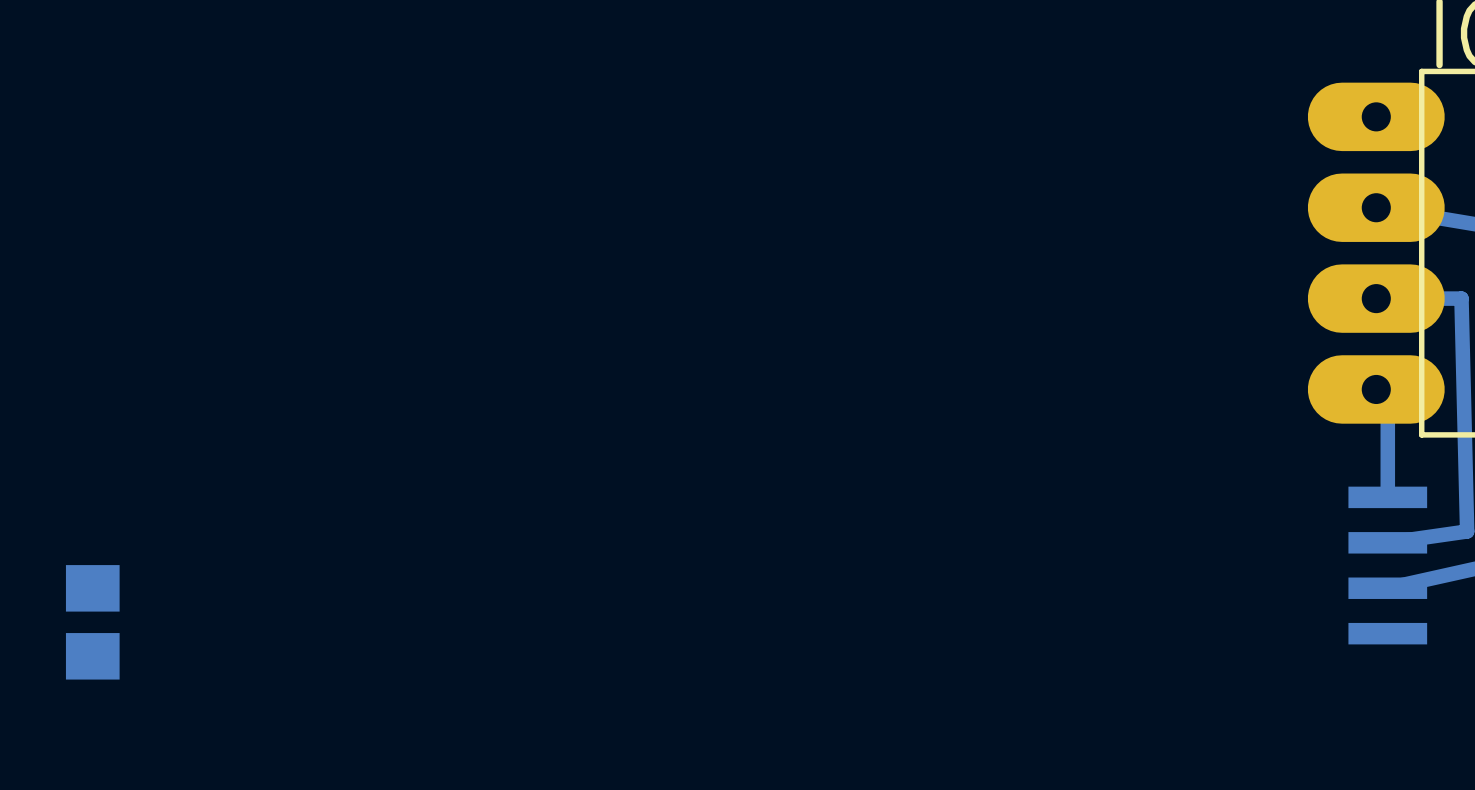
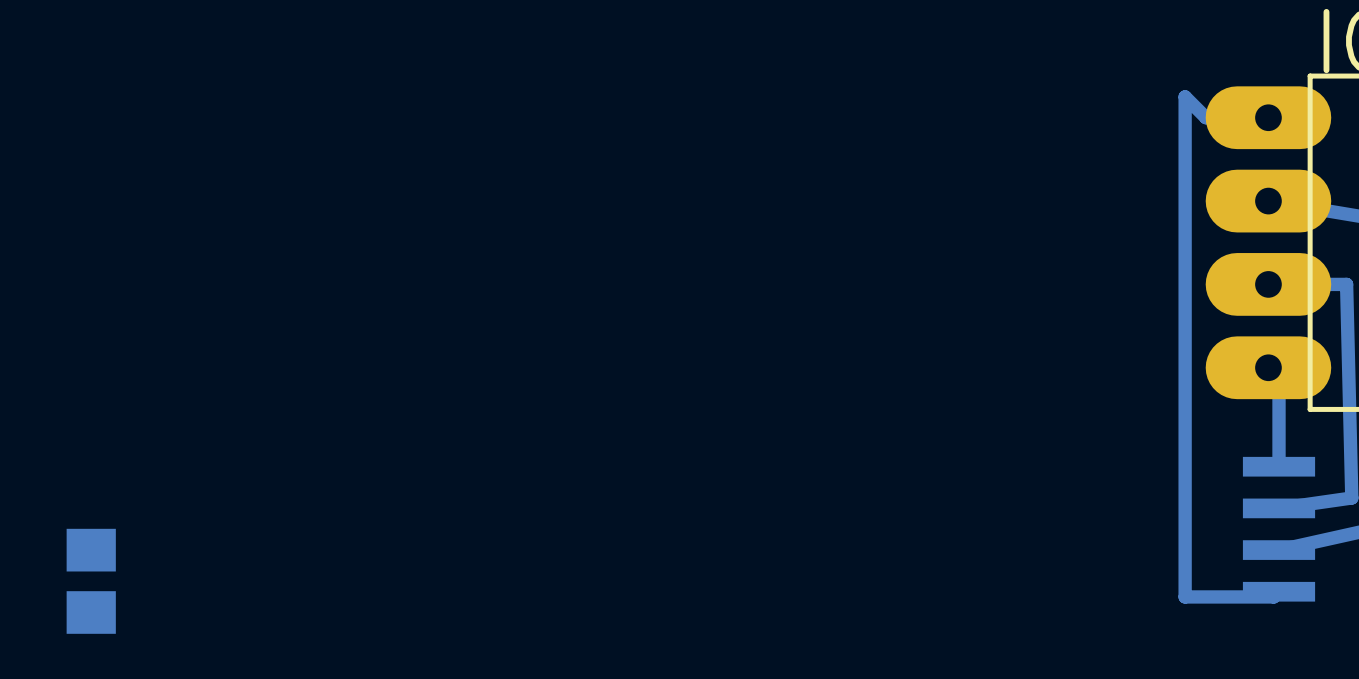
bottom track: none -> (1268, 117) (1205, 117) (1185, 96) (1185, 596) (1273, 596) (1279, 591)

